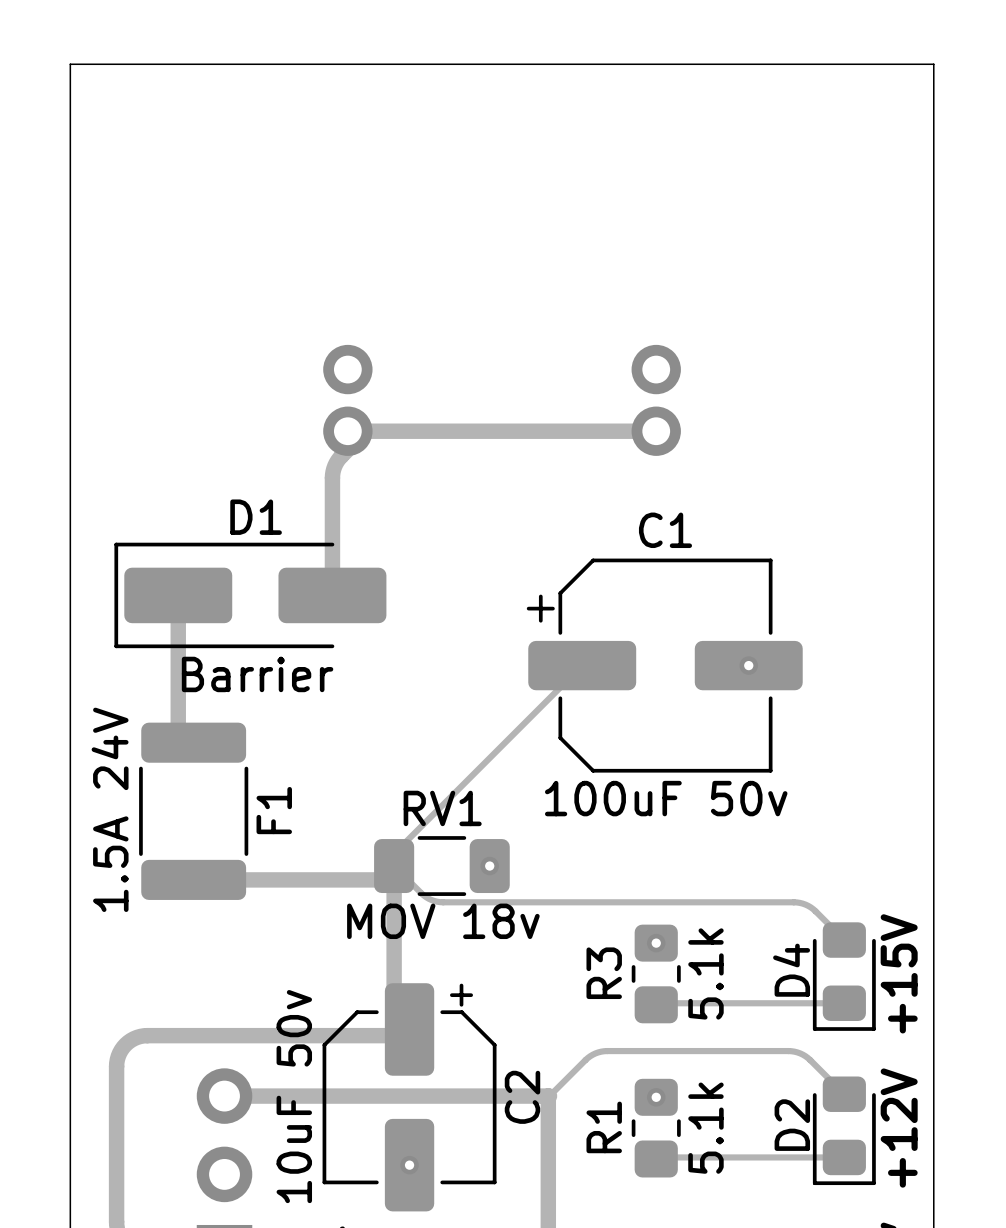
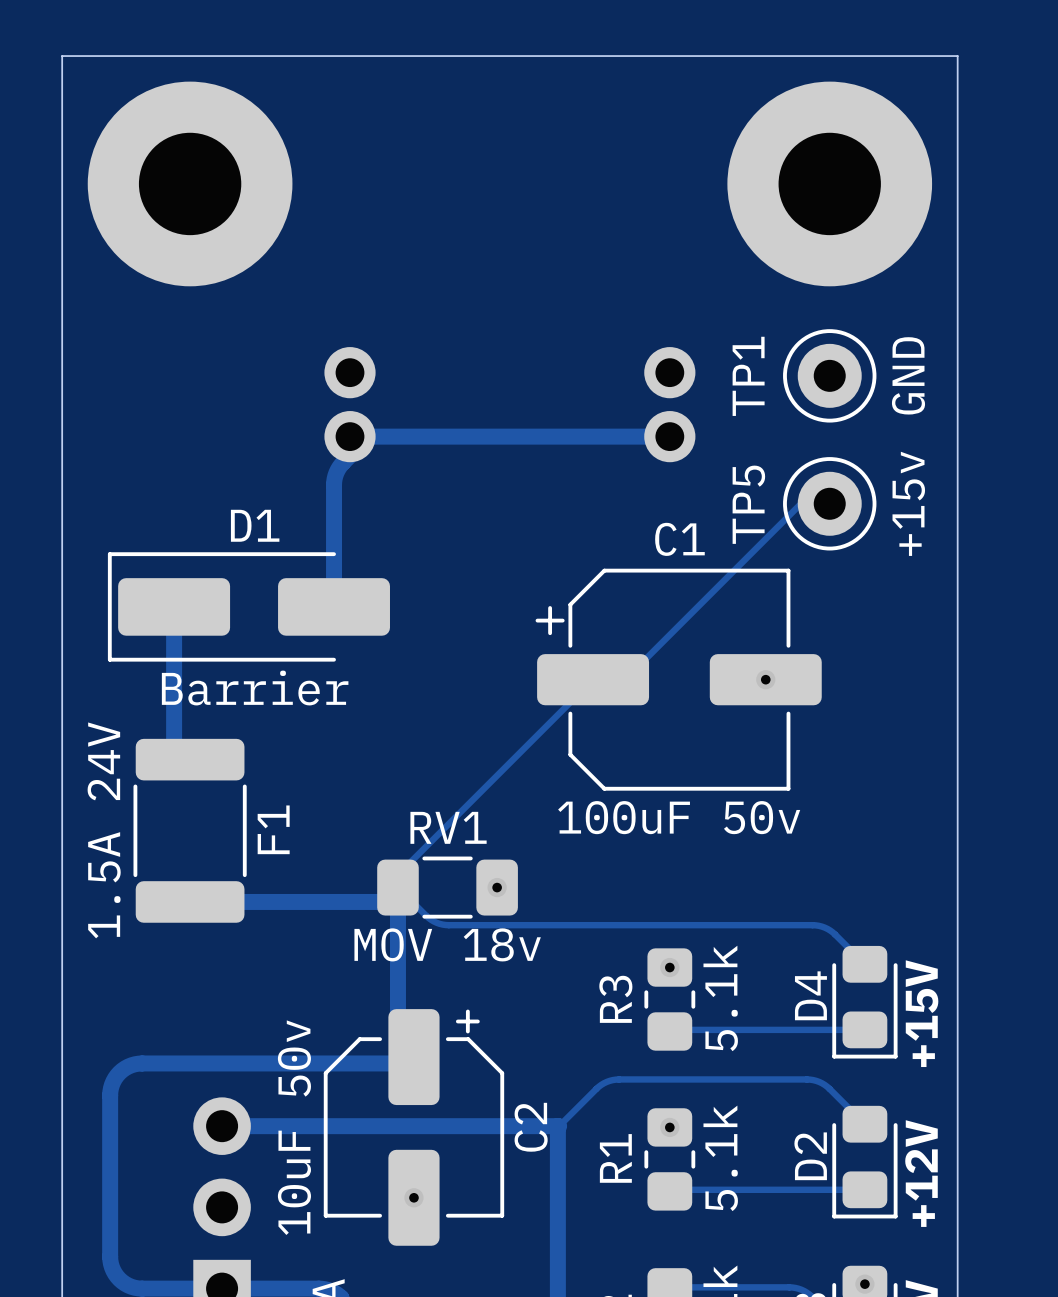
part: none -> (190, 183)
part: none -> (829, 183)
TP1: none -> GND (829, 375)
track: none -> (829, 503) (800, 503) (625, 679) (593, 679)
TP5: none -> +15v (829, 503)

